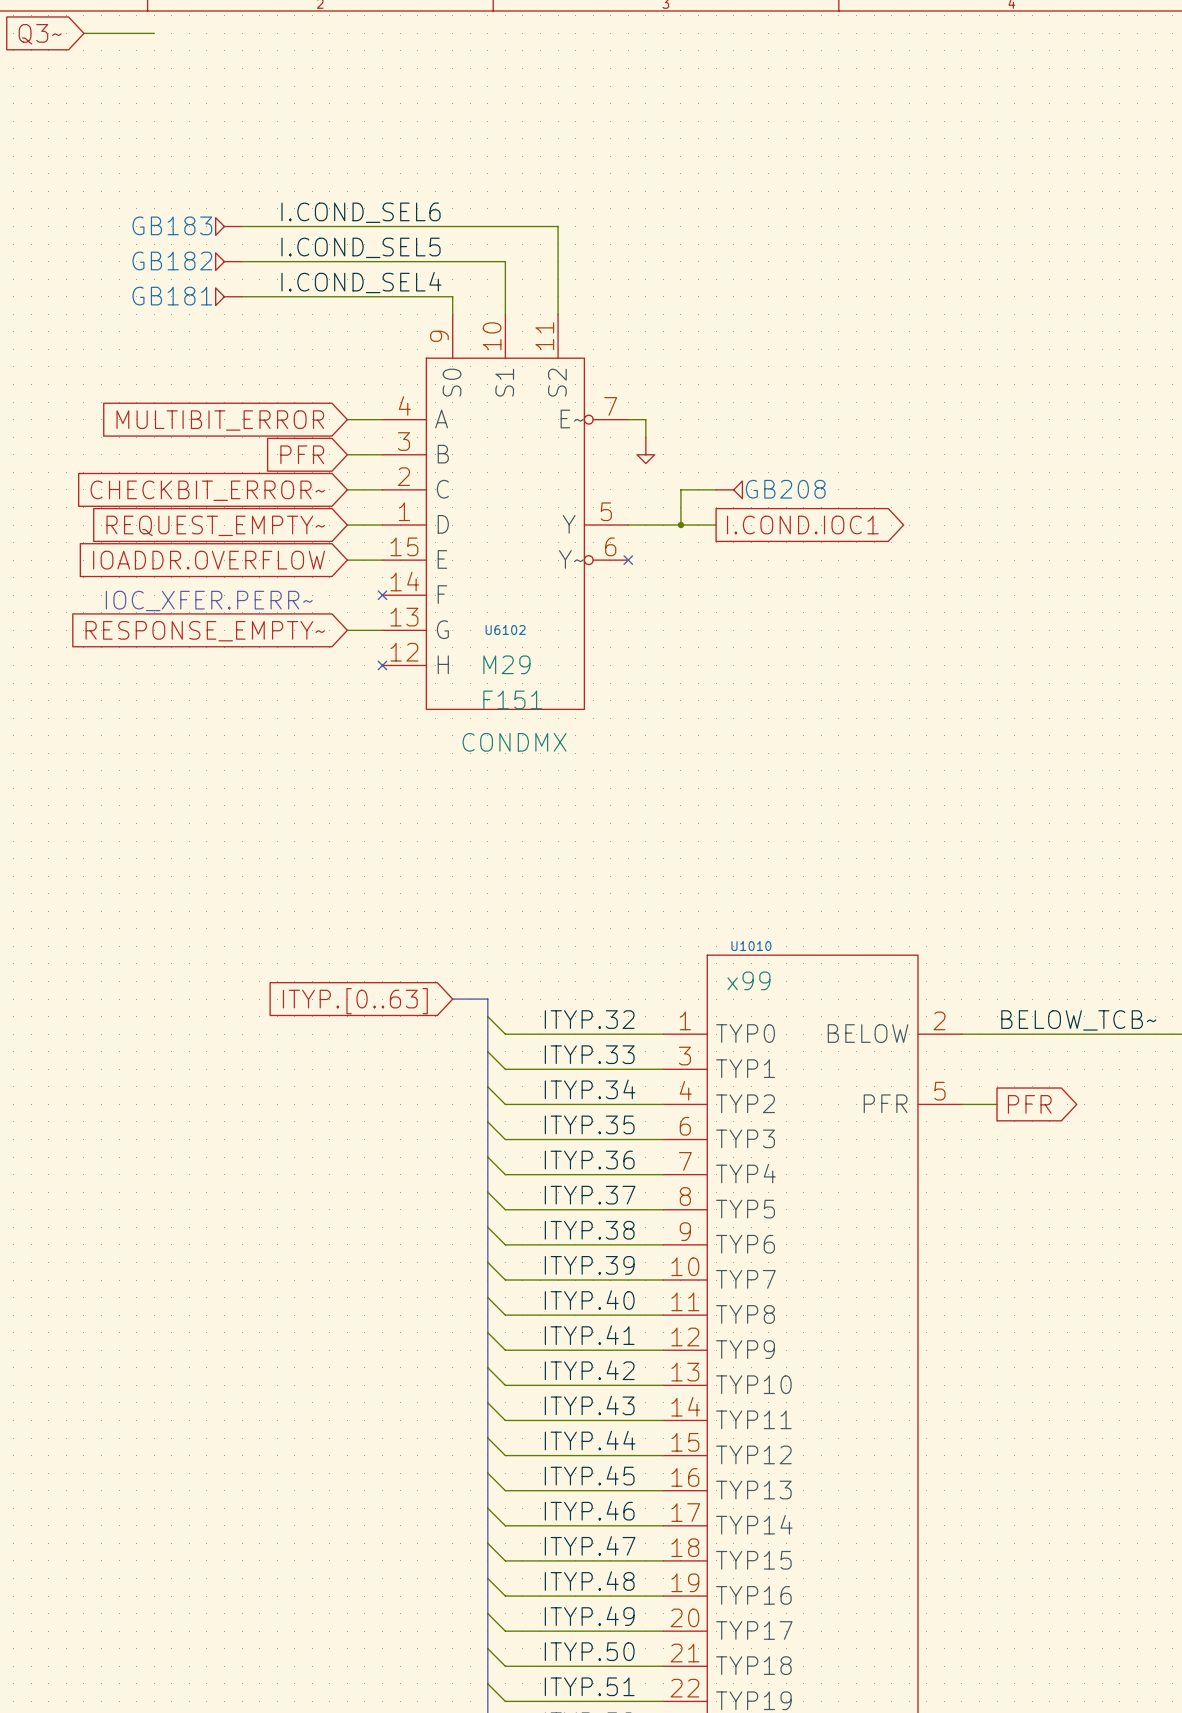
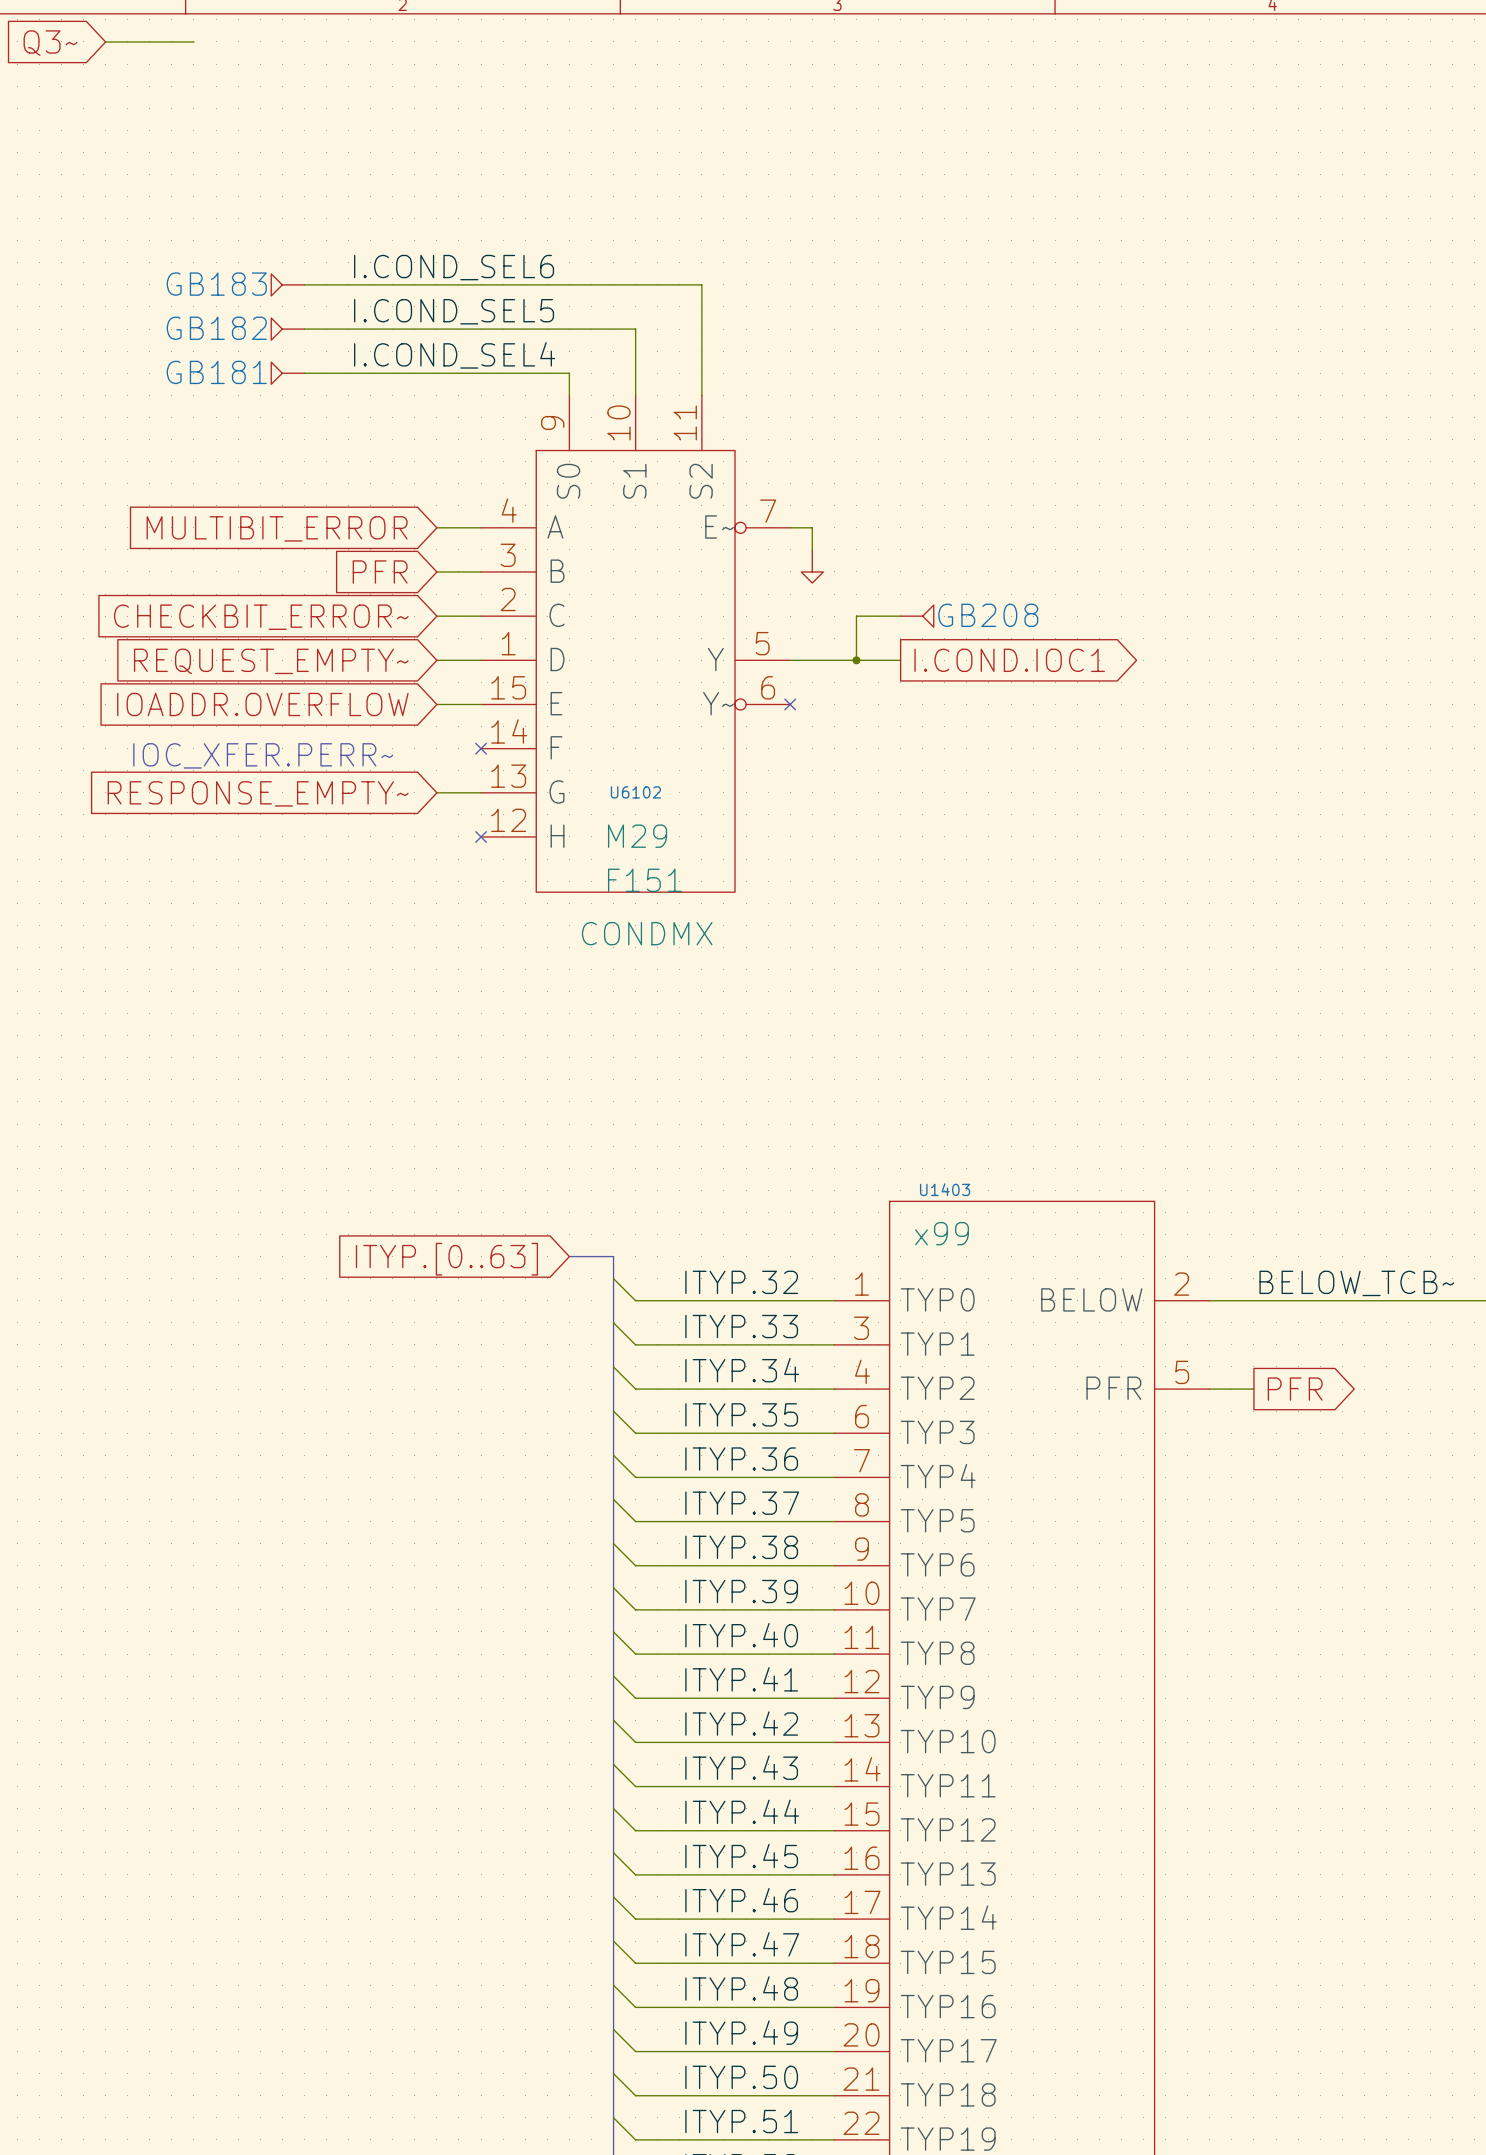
U1010 name: U1010 (751, 946) -> U1403 (945, 1189)

